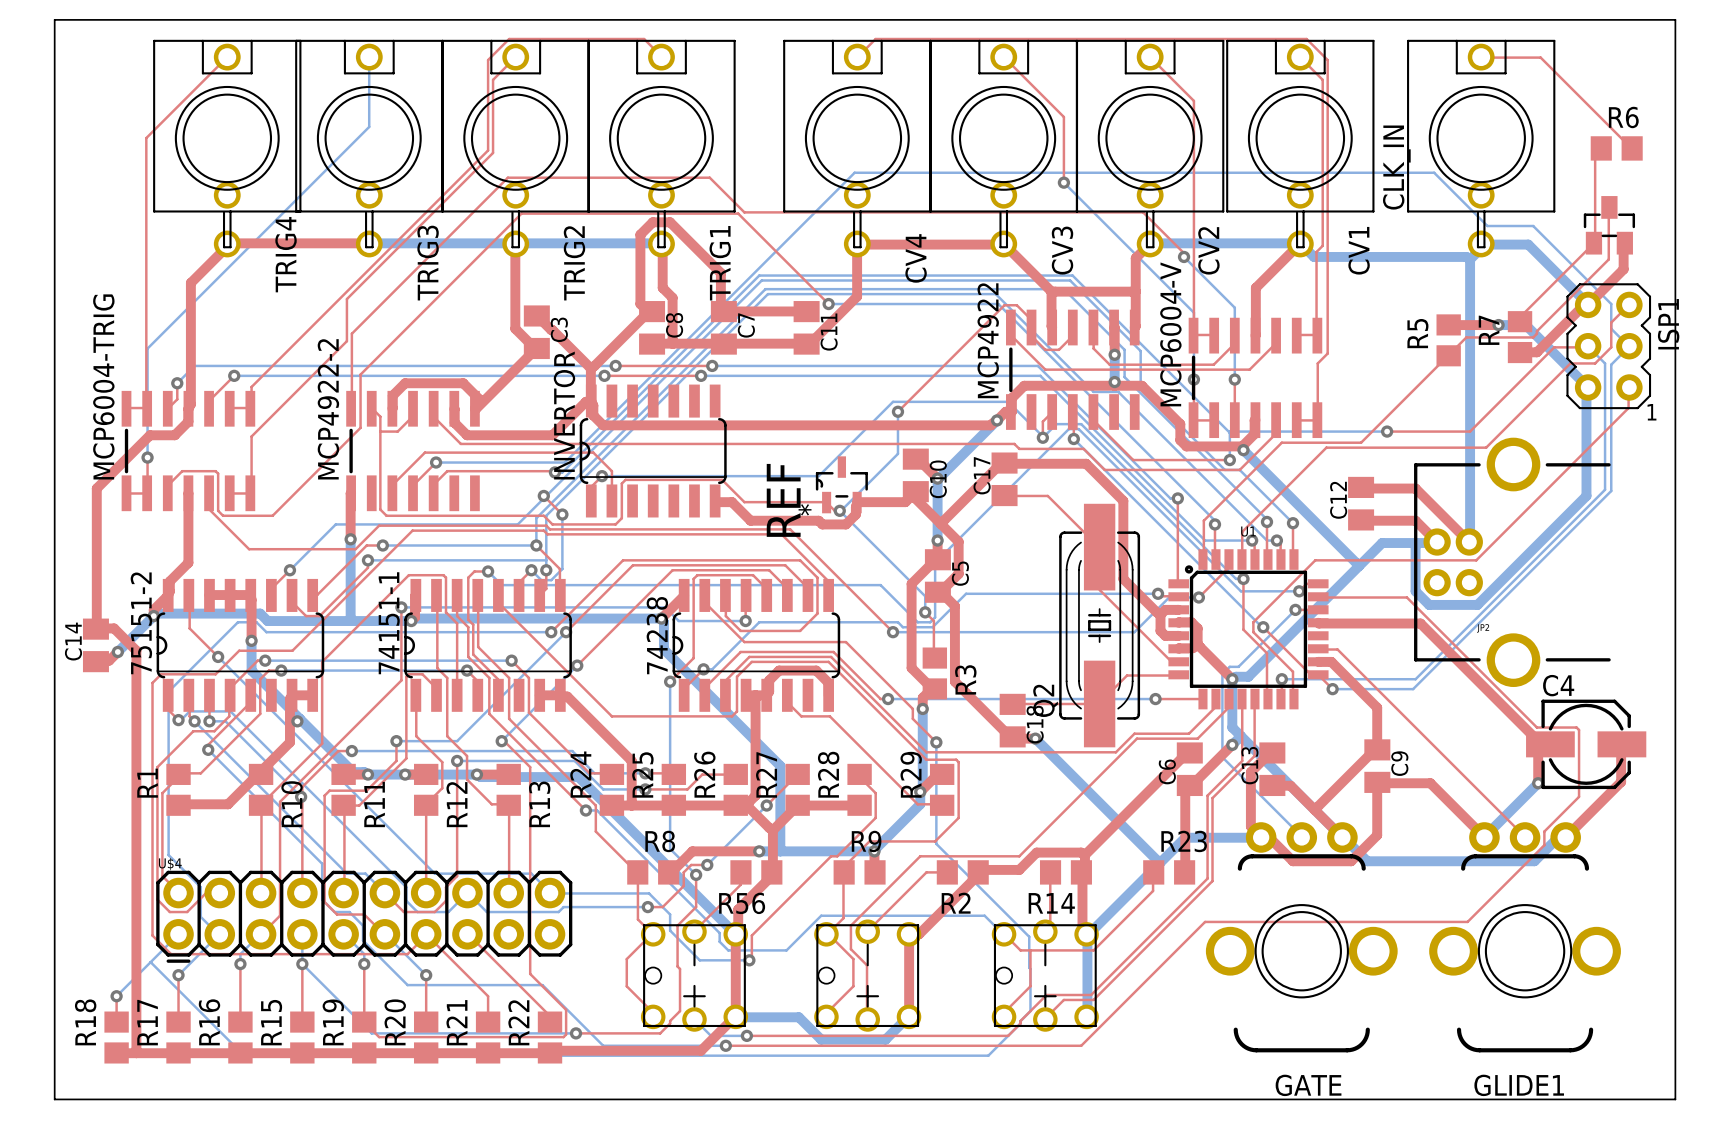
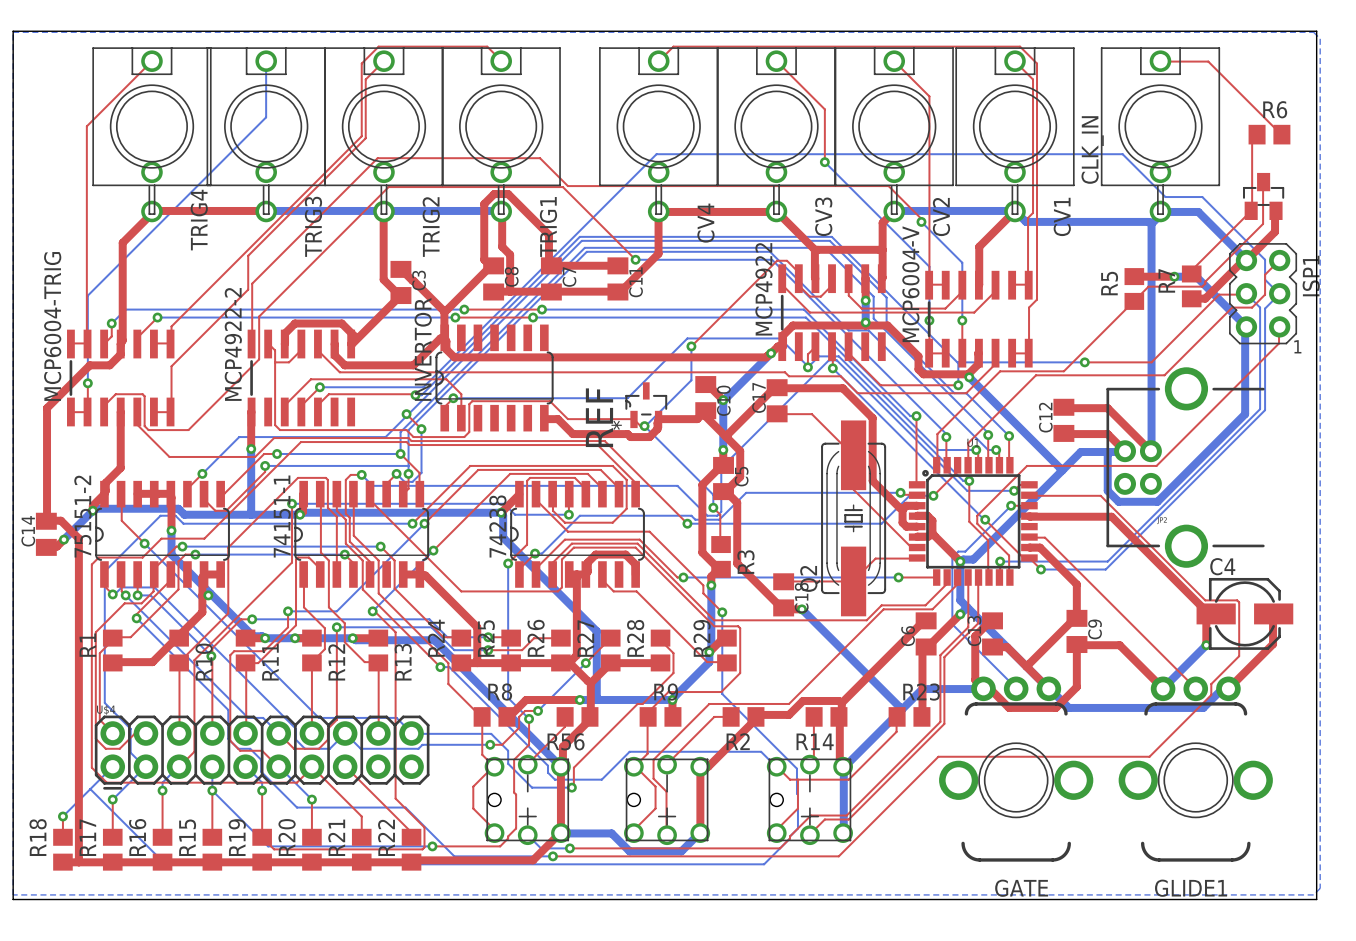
bottom zone outline: none -> (13, 32) (1313, 32) (1320, 38) (1320, 888) (1313, 894) (13, 894) (13, 32)

